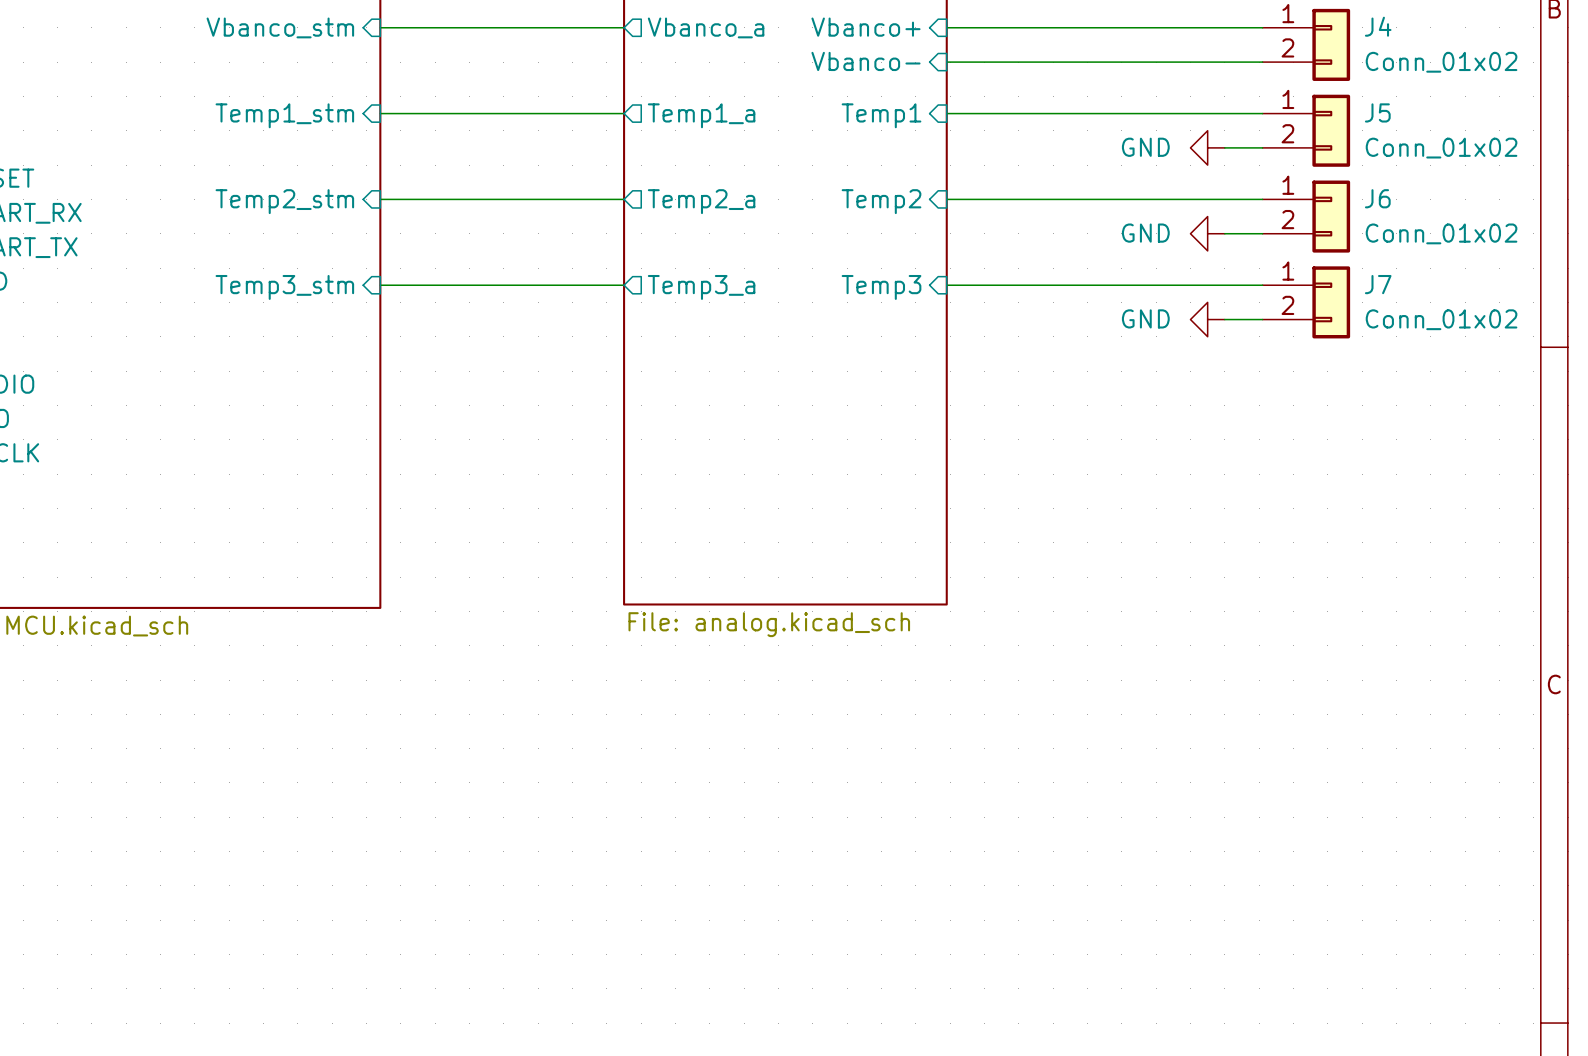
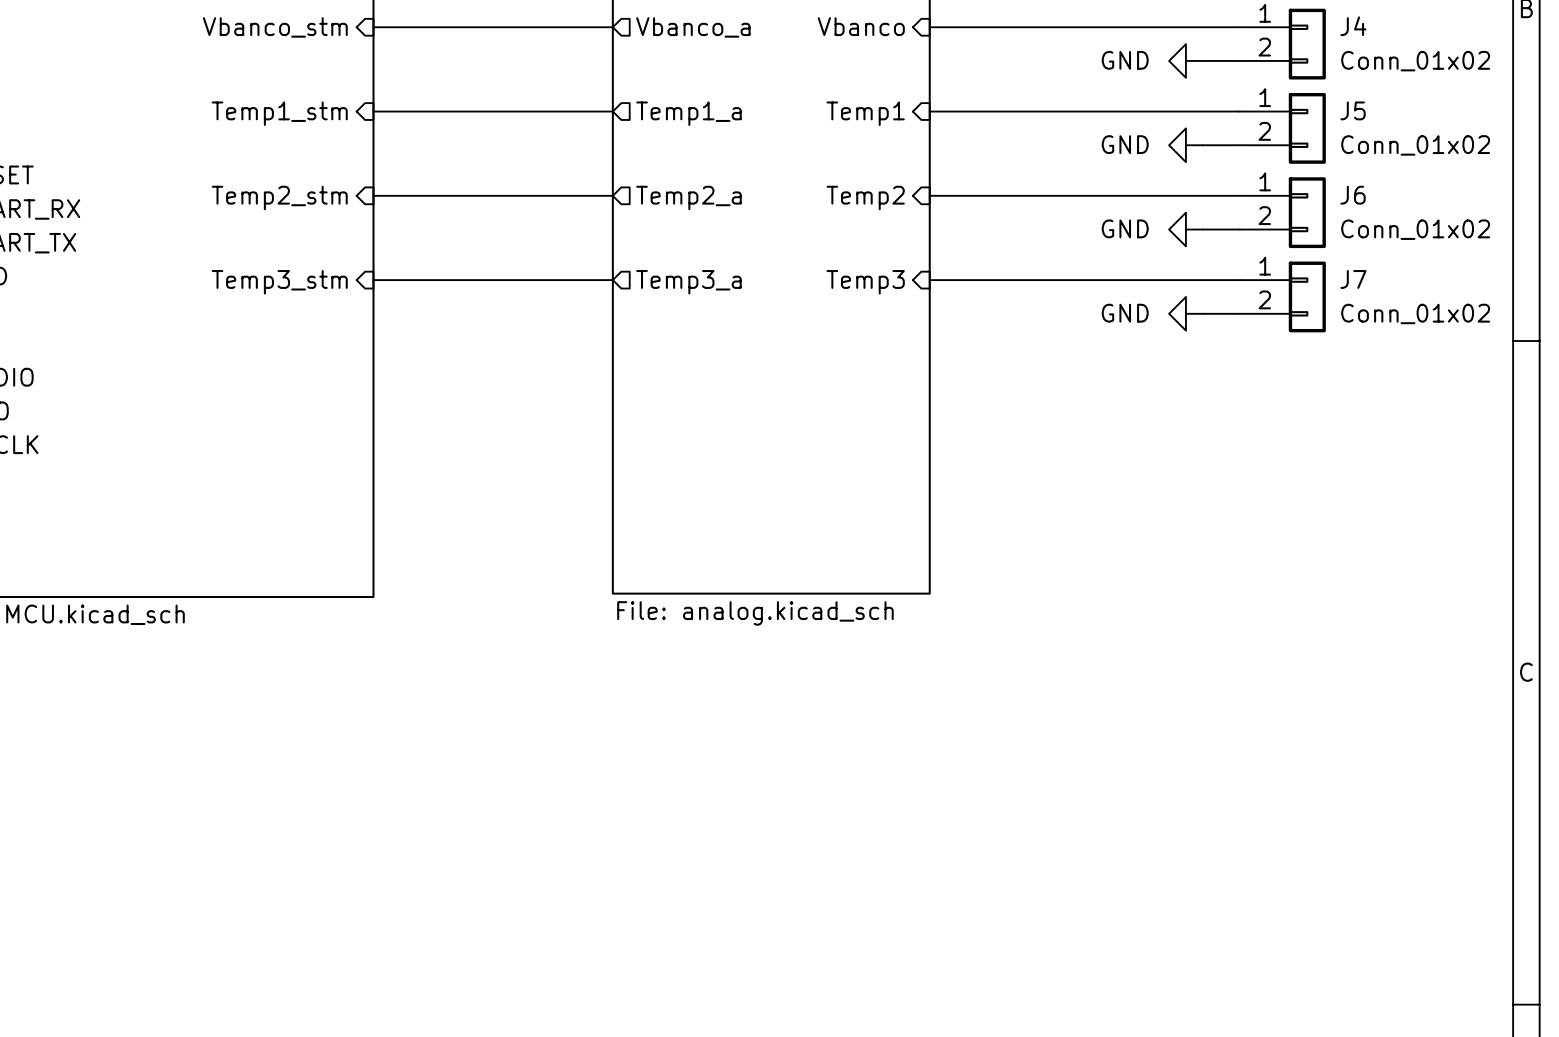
sheet pin: Vbanco+ (865, 27) -> Vbanco (861, 26)
sheet pin: Vbanco- (865, 61) -> none
wire: (946, 62) (1224, 62) -> none
power symbol: none -> GND (1185, 60)

